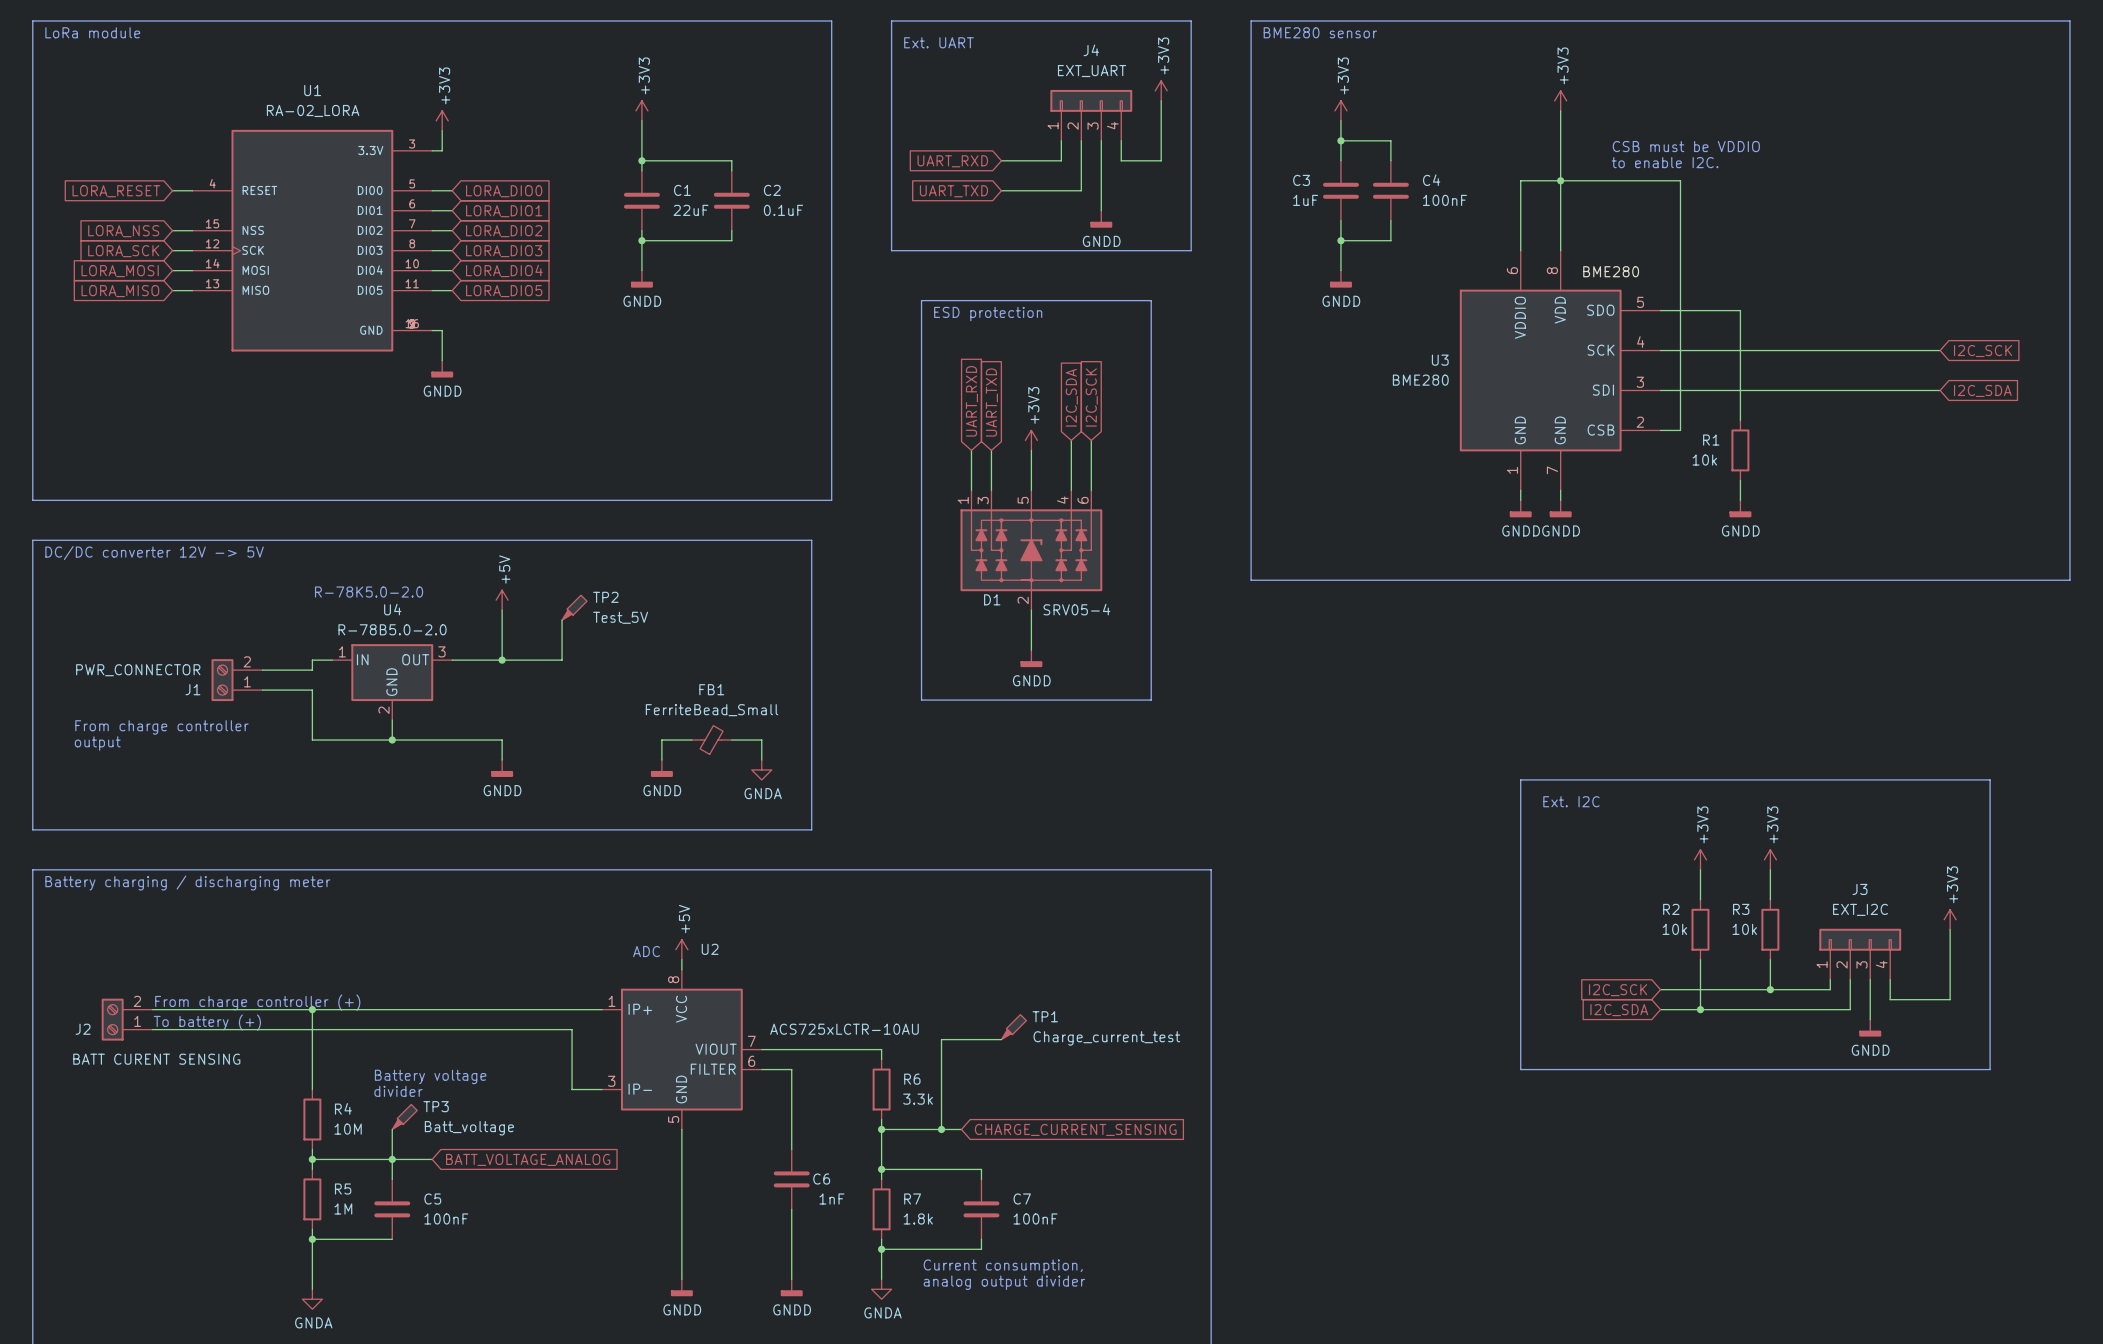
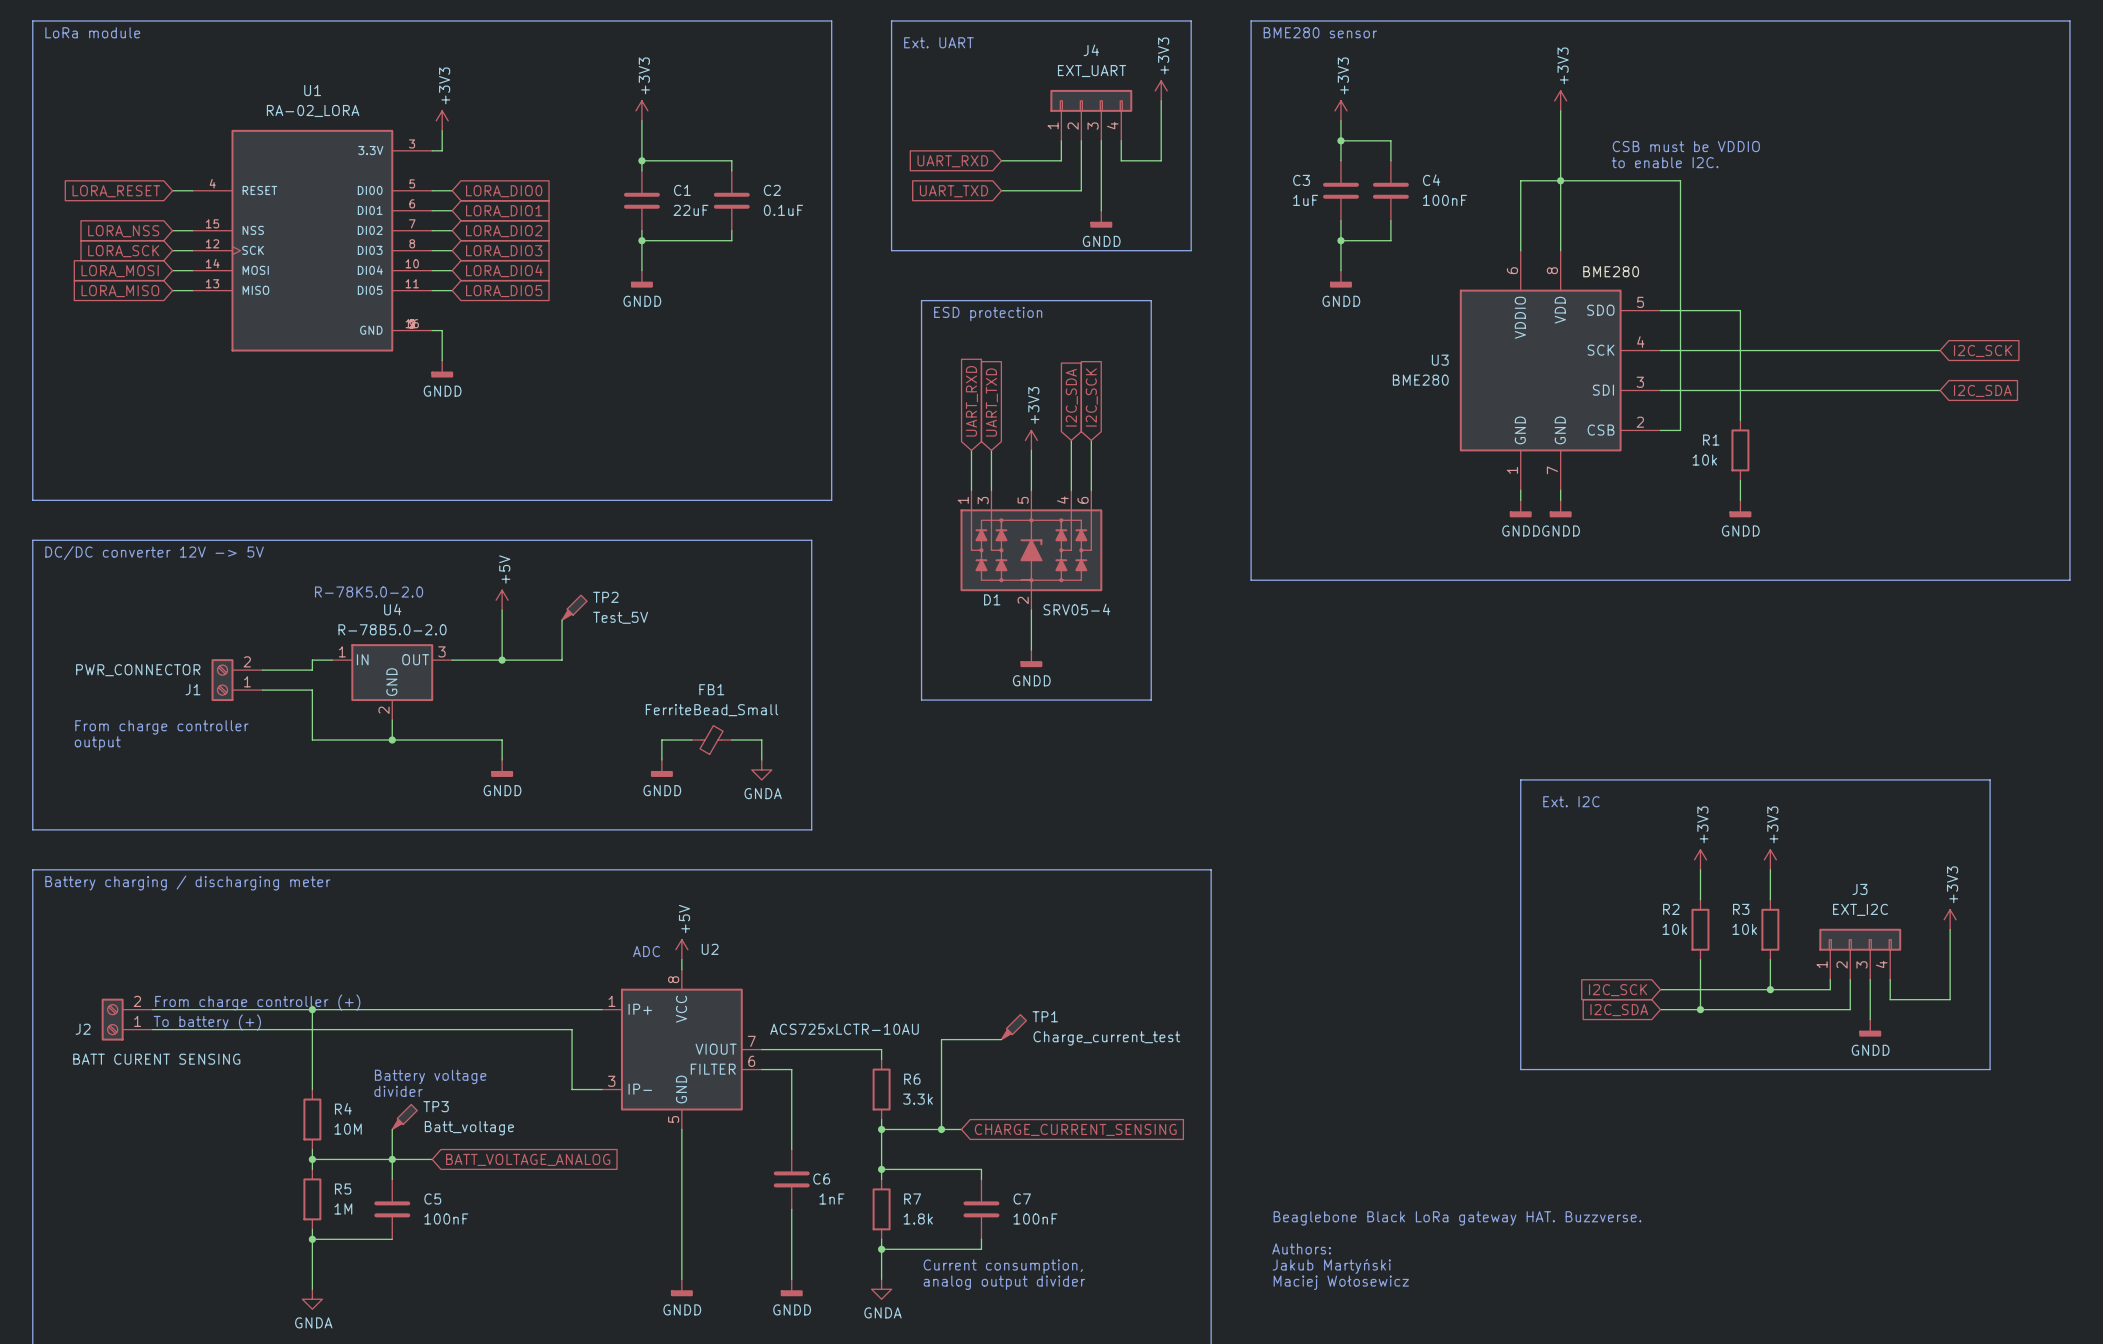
text: none -> Beaglebone Black LoRa gateway HAT. Buzzverse. (1457, 1218)
text: none -> Authors: (1301, 1248)
text: none -> Jakub Martyński (1331, 1266)
text: none -> Maciej Wołosewicz (1341, 1282)

